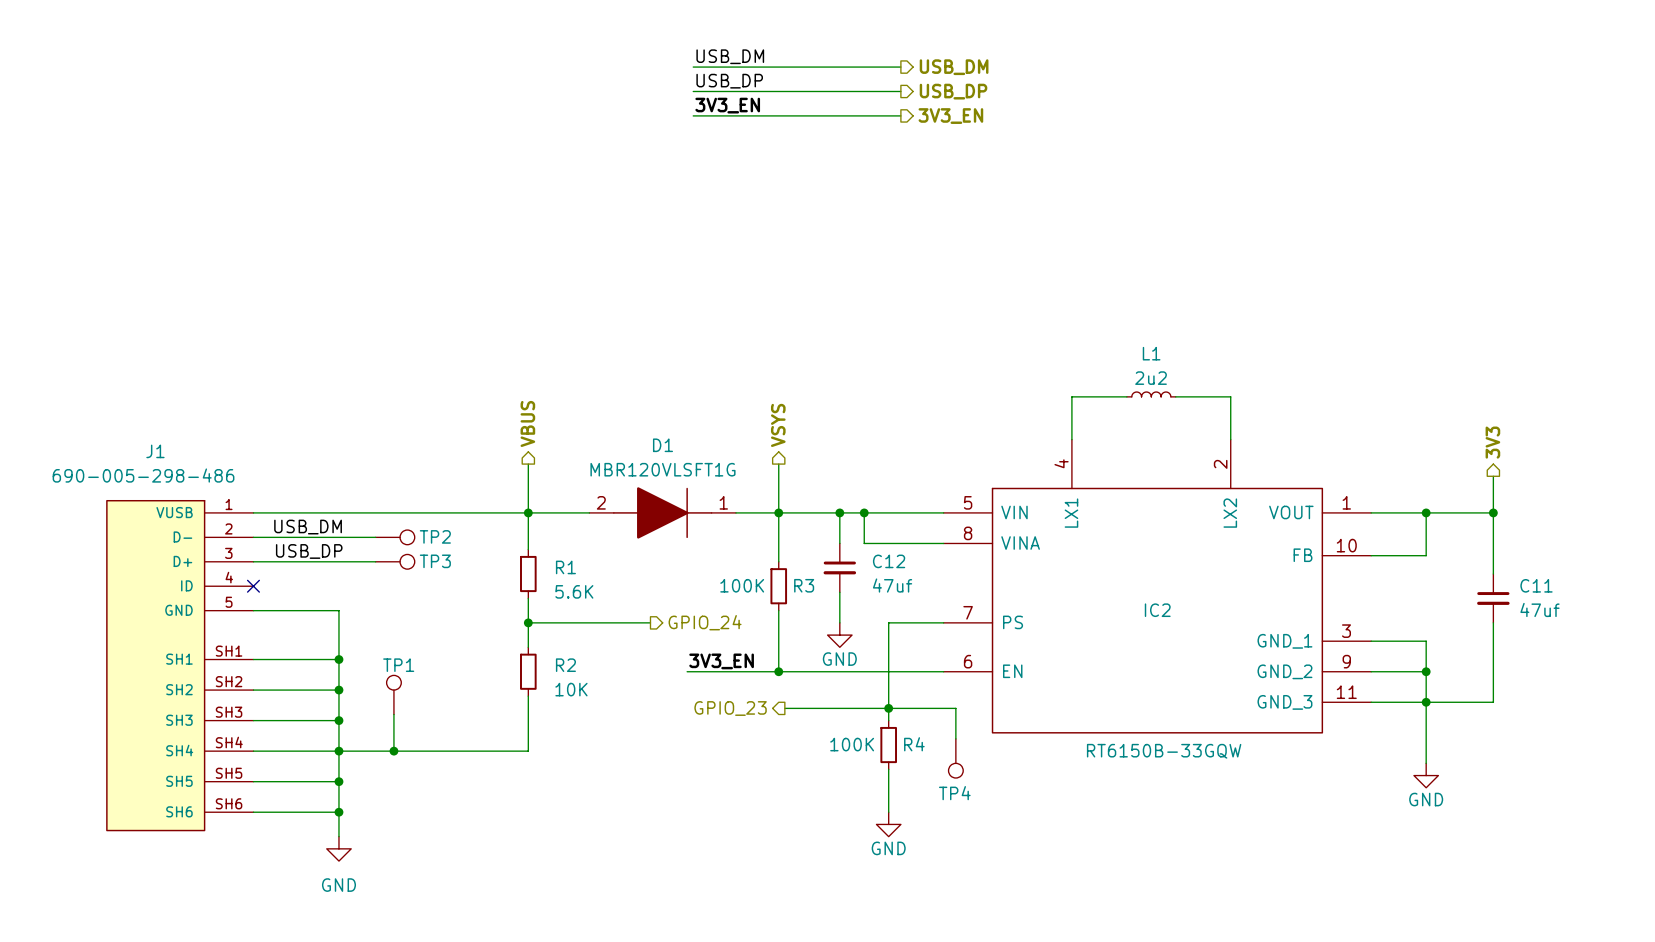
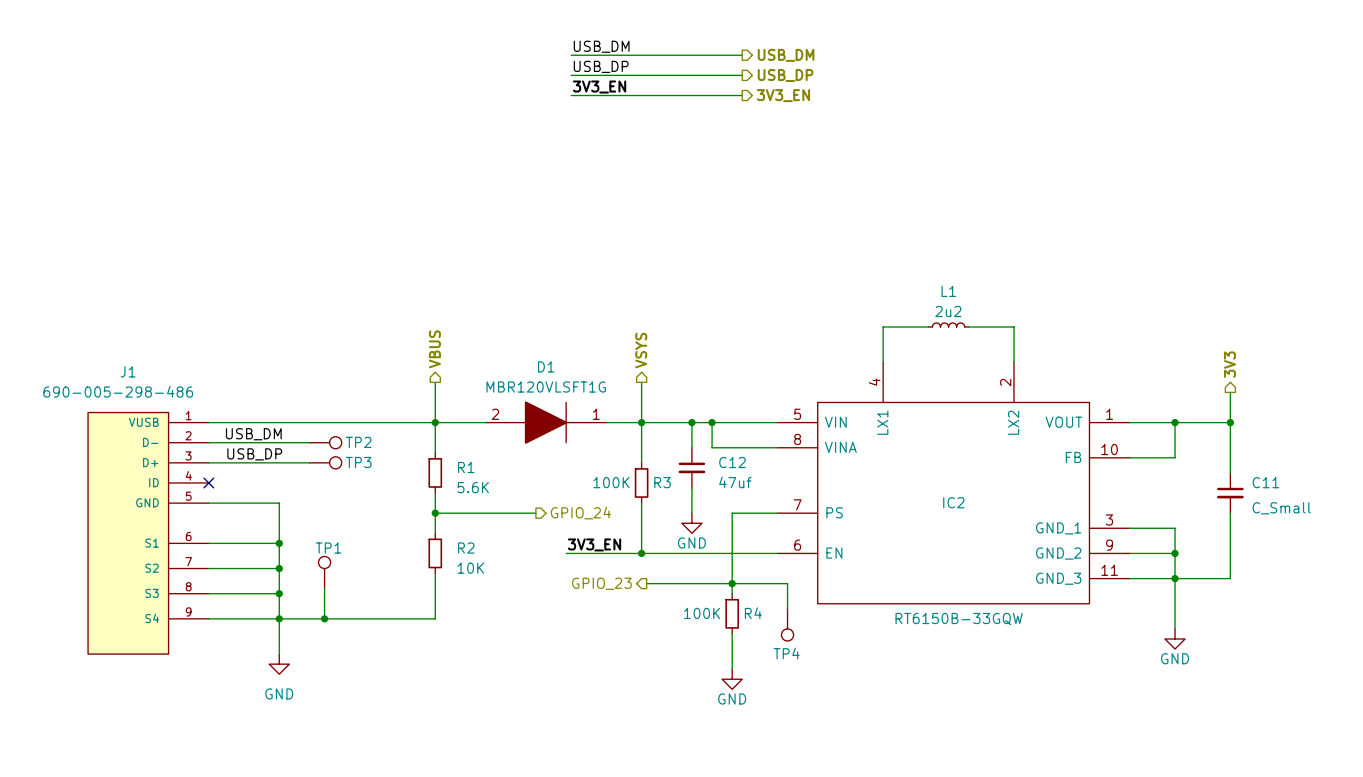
J1 symbol: [106, 499, 254, 832] -> [87, 411, 209, 655]
C11 value: 47uf (1539, 609) -> C_Small (1281, 508)
wire: (253, 781) (338, 781) -> none
junction: (338, 781) -> none
wire: (338, 793) (338, 836) -> none
wire: (253, 812) (338, 812) -> none
junction: (338, 812) -> none
power symbol position: GND (338, 848) -> GND (279, 664)

